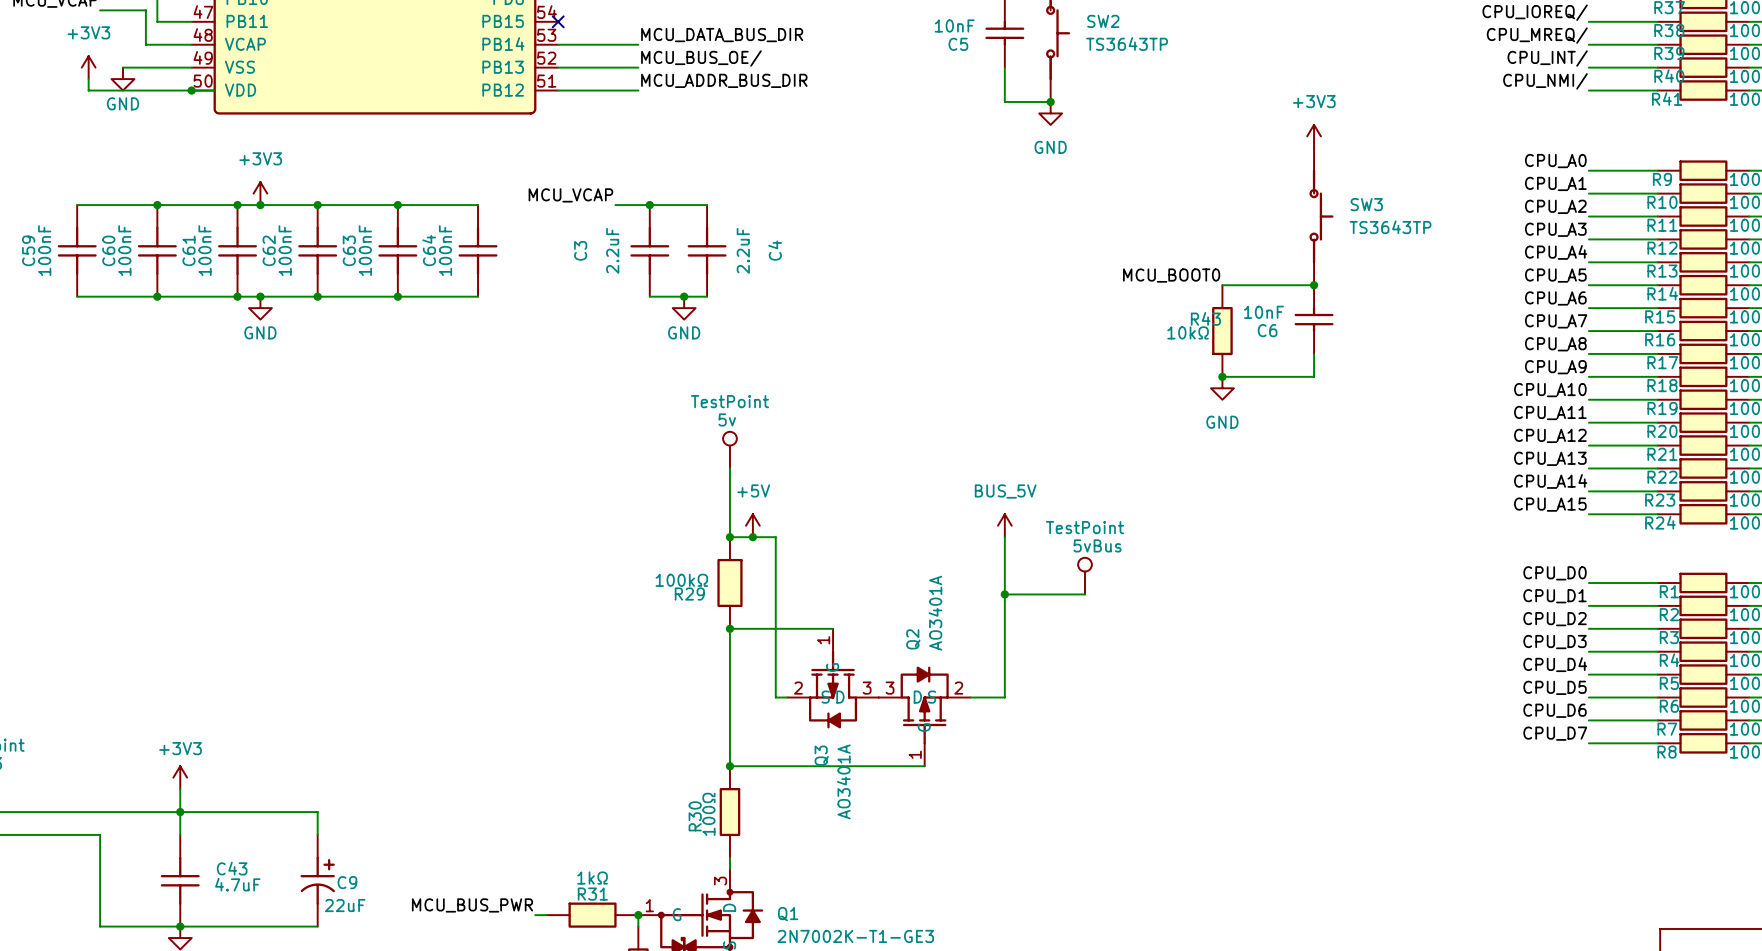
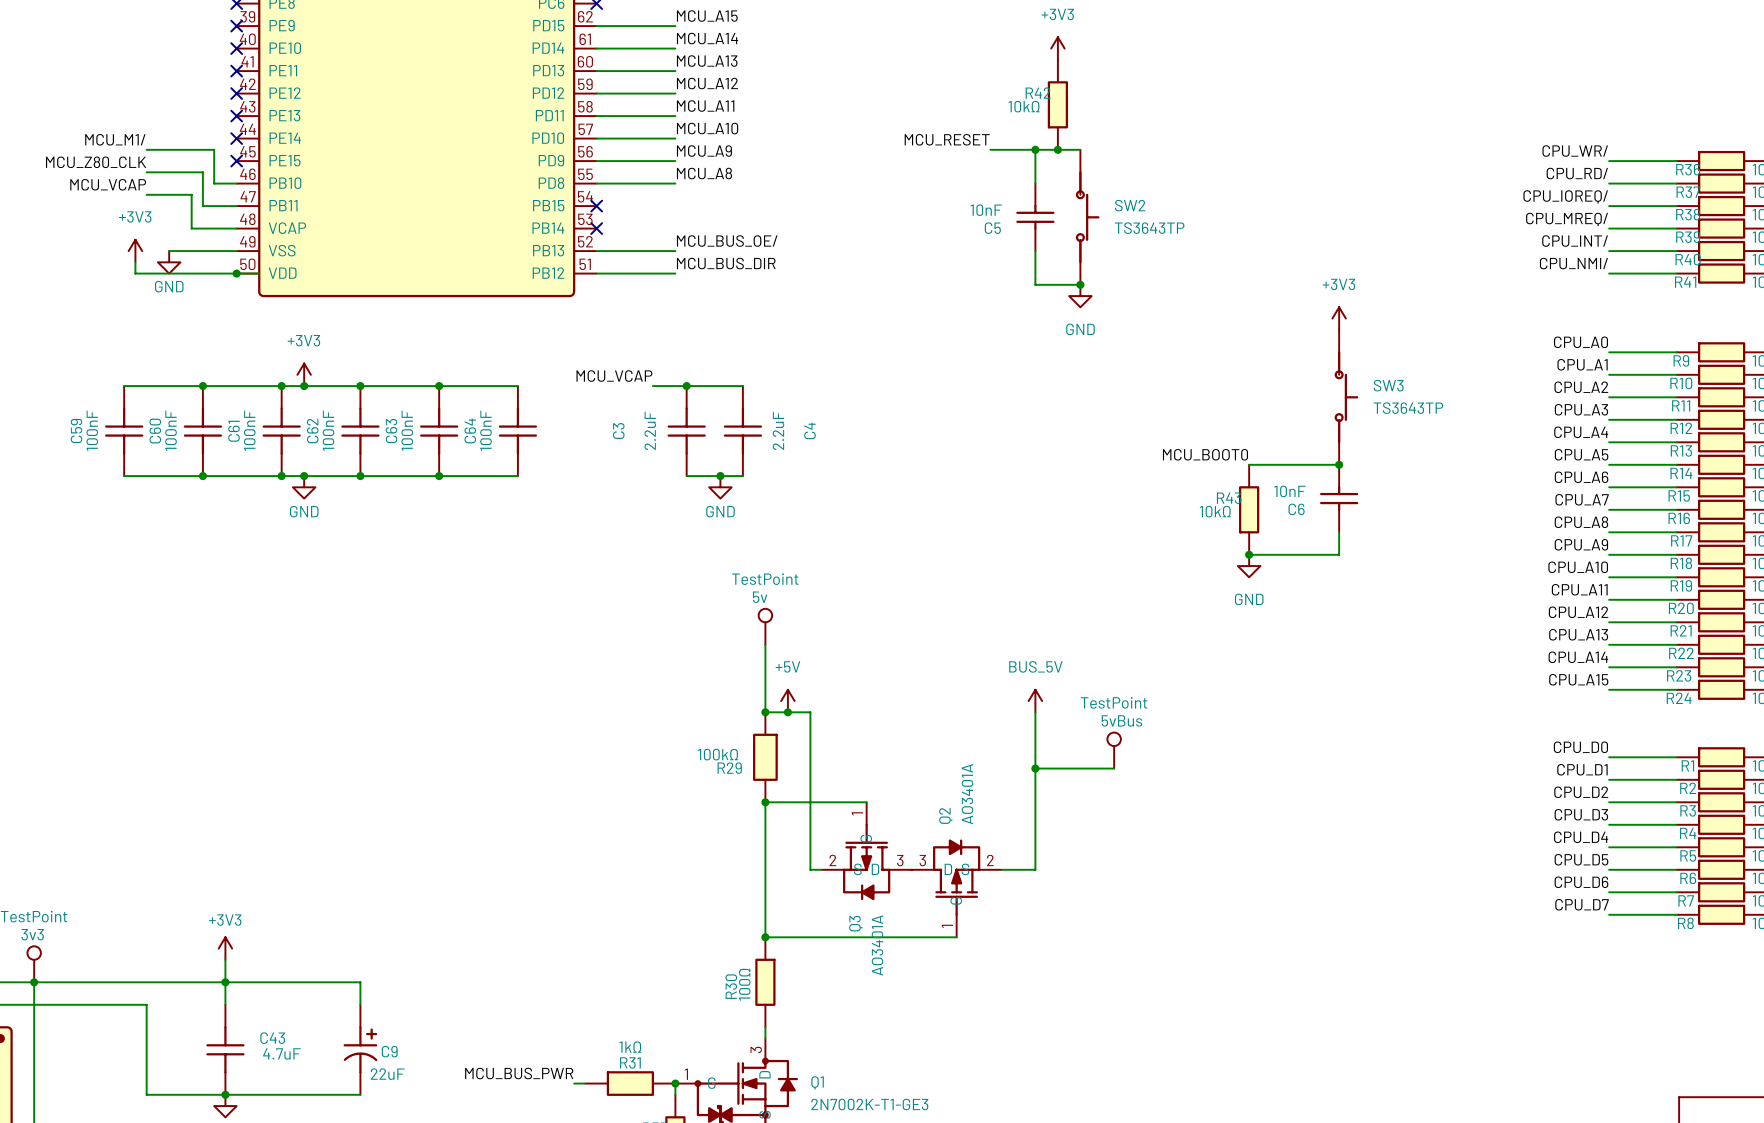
label: MCU_DATA_BUS_DIR (722, 35) -> none
wire: (558, 44) (638, 44) -> none
no-connect mark: none -> (596, 228)
label: MCU_ADDR_BUS_DIR (724, 80) -> MCU_BUS_DIR (726, 263)

